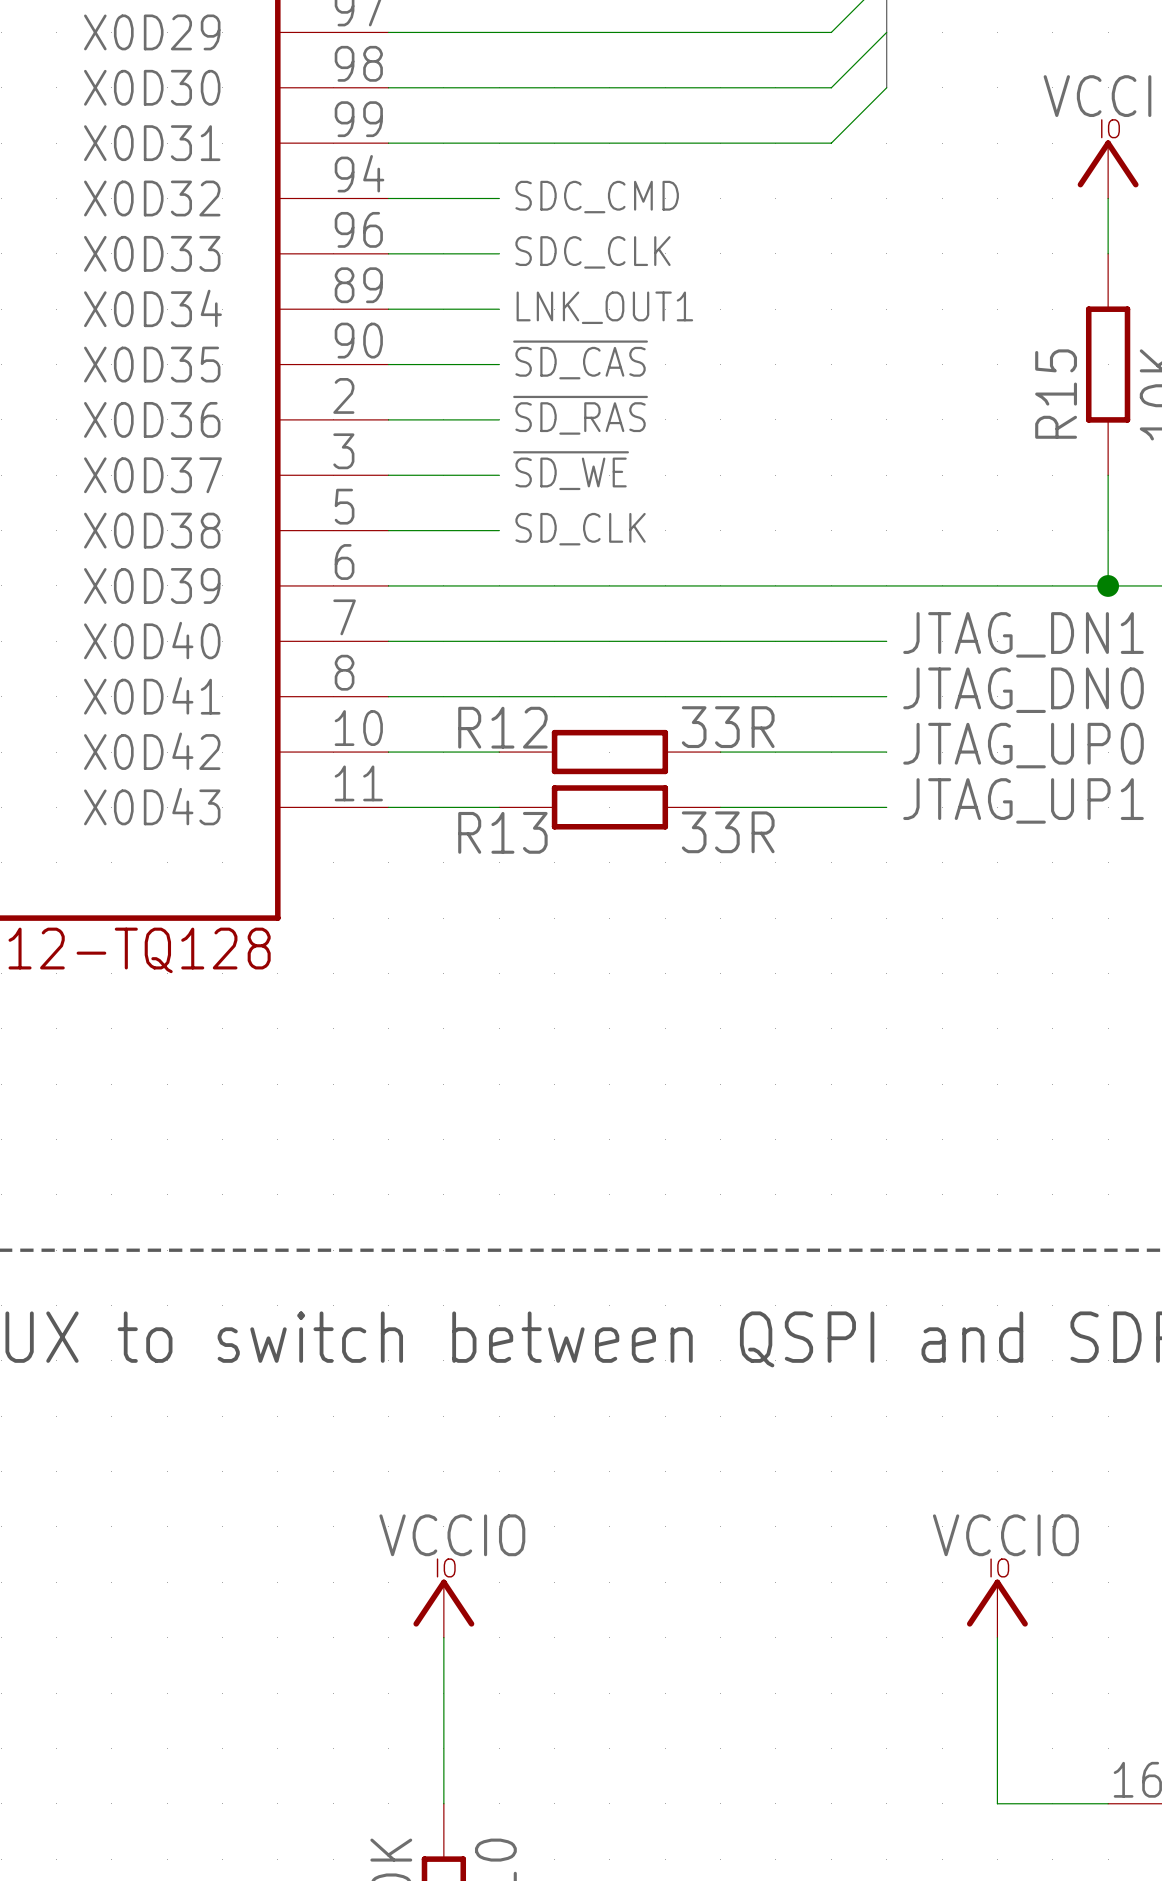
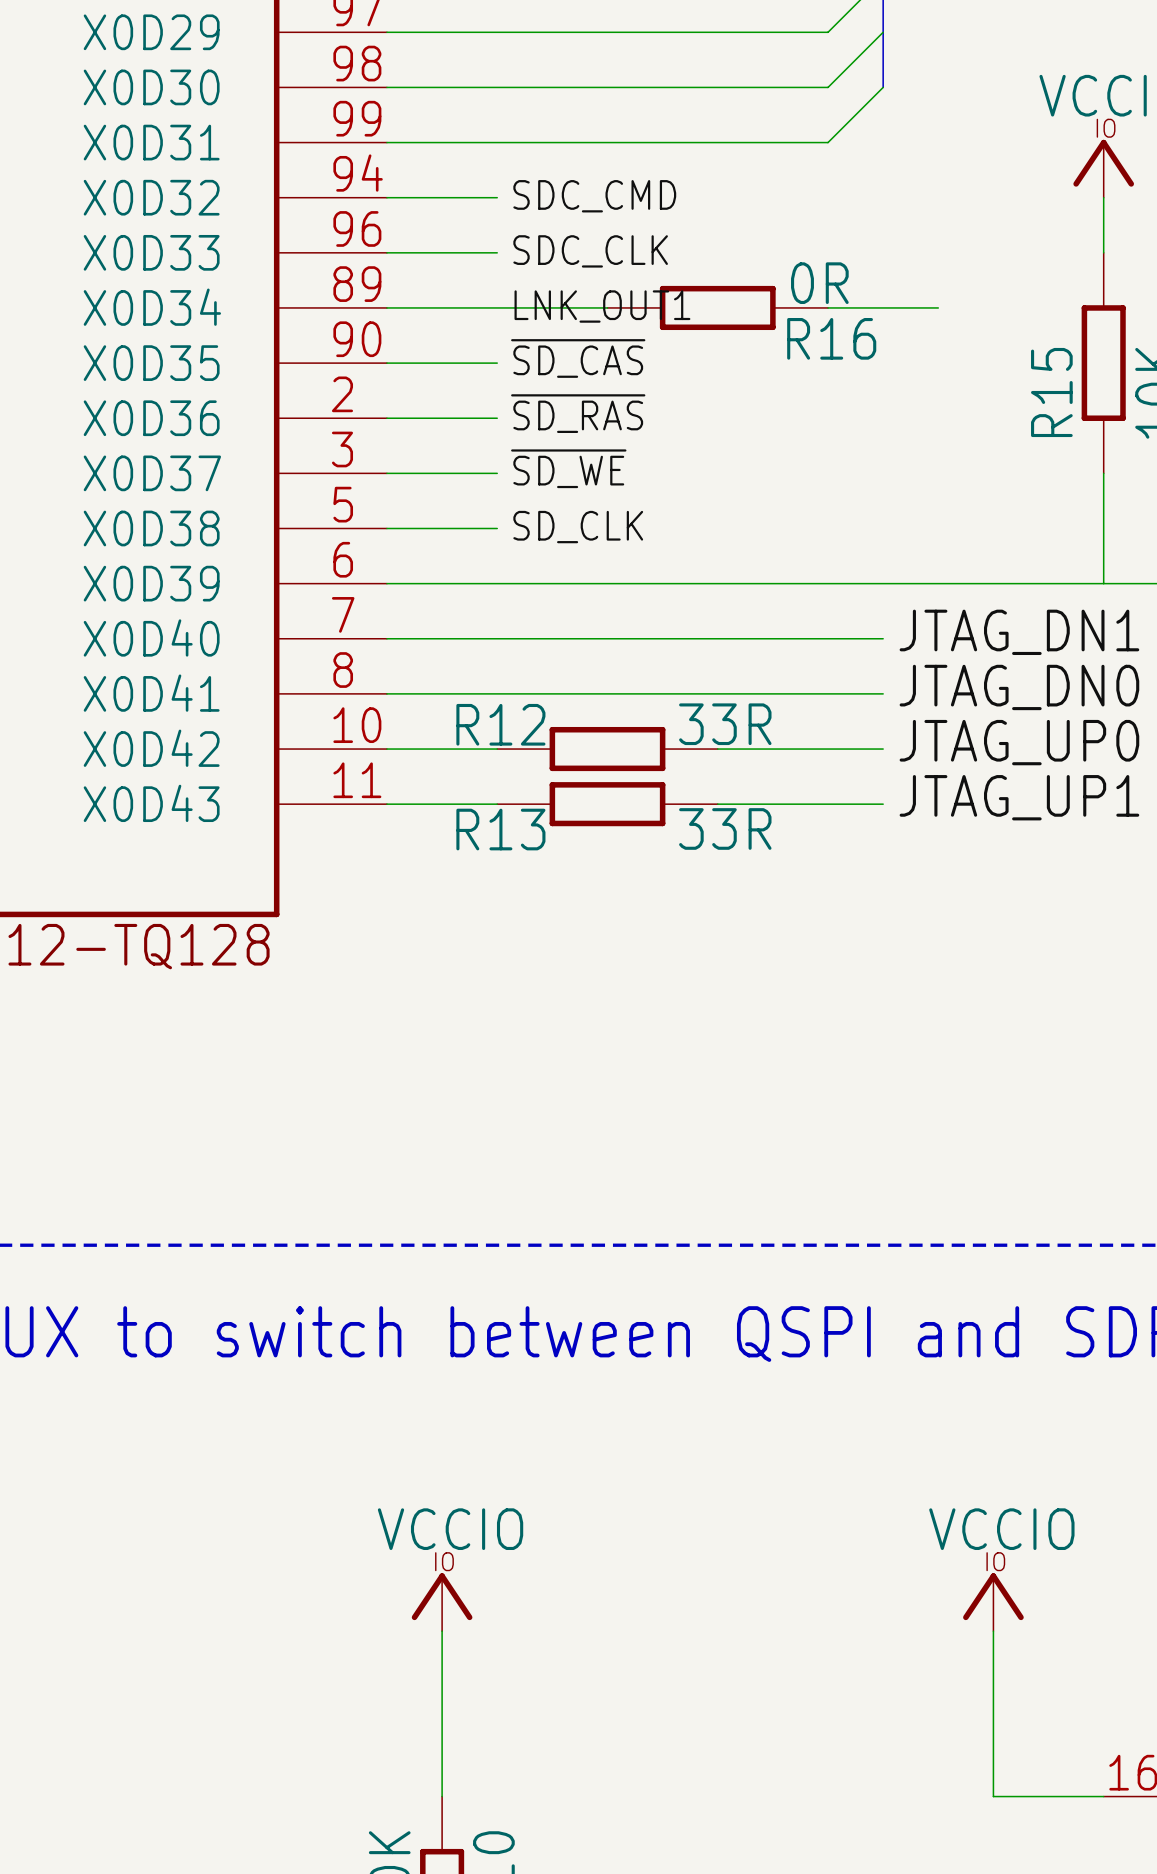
wire: none -> (497, 307) (607, 307)
R16: none -> 0R (717, 307)
wire: none -> (828, 307) (938, 307)
junction: (1108, 585) -> none

